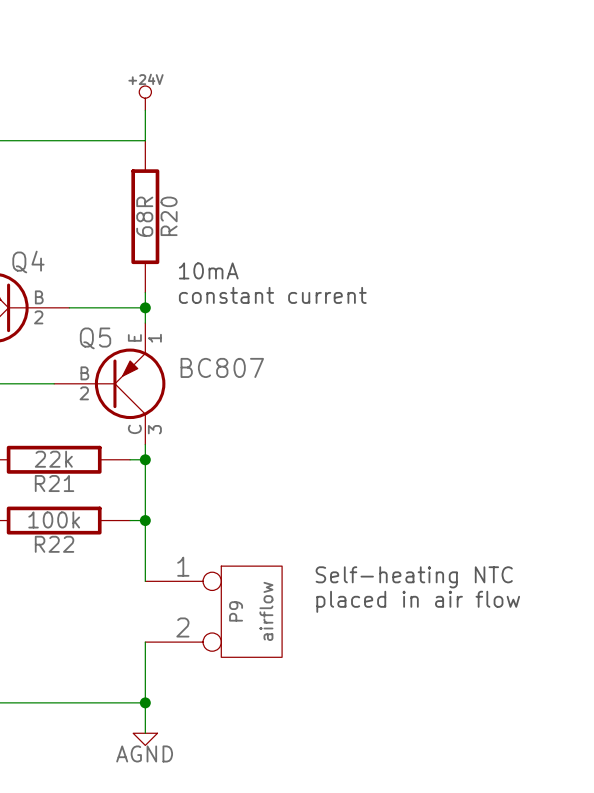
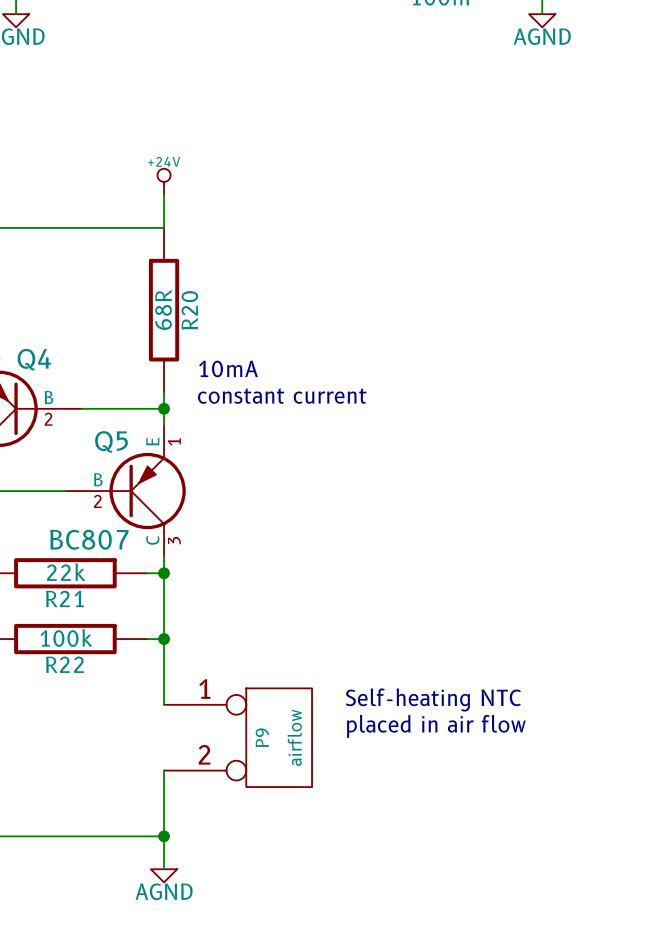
Q5 value position: BC807 (222, 367) -> BC807 (89, 539)

